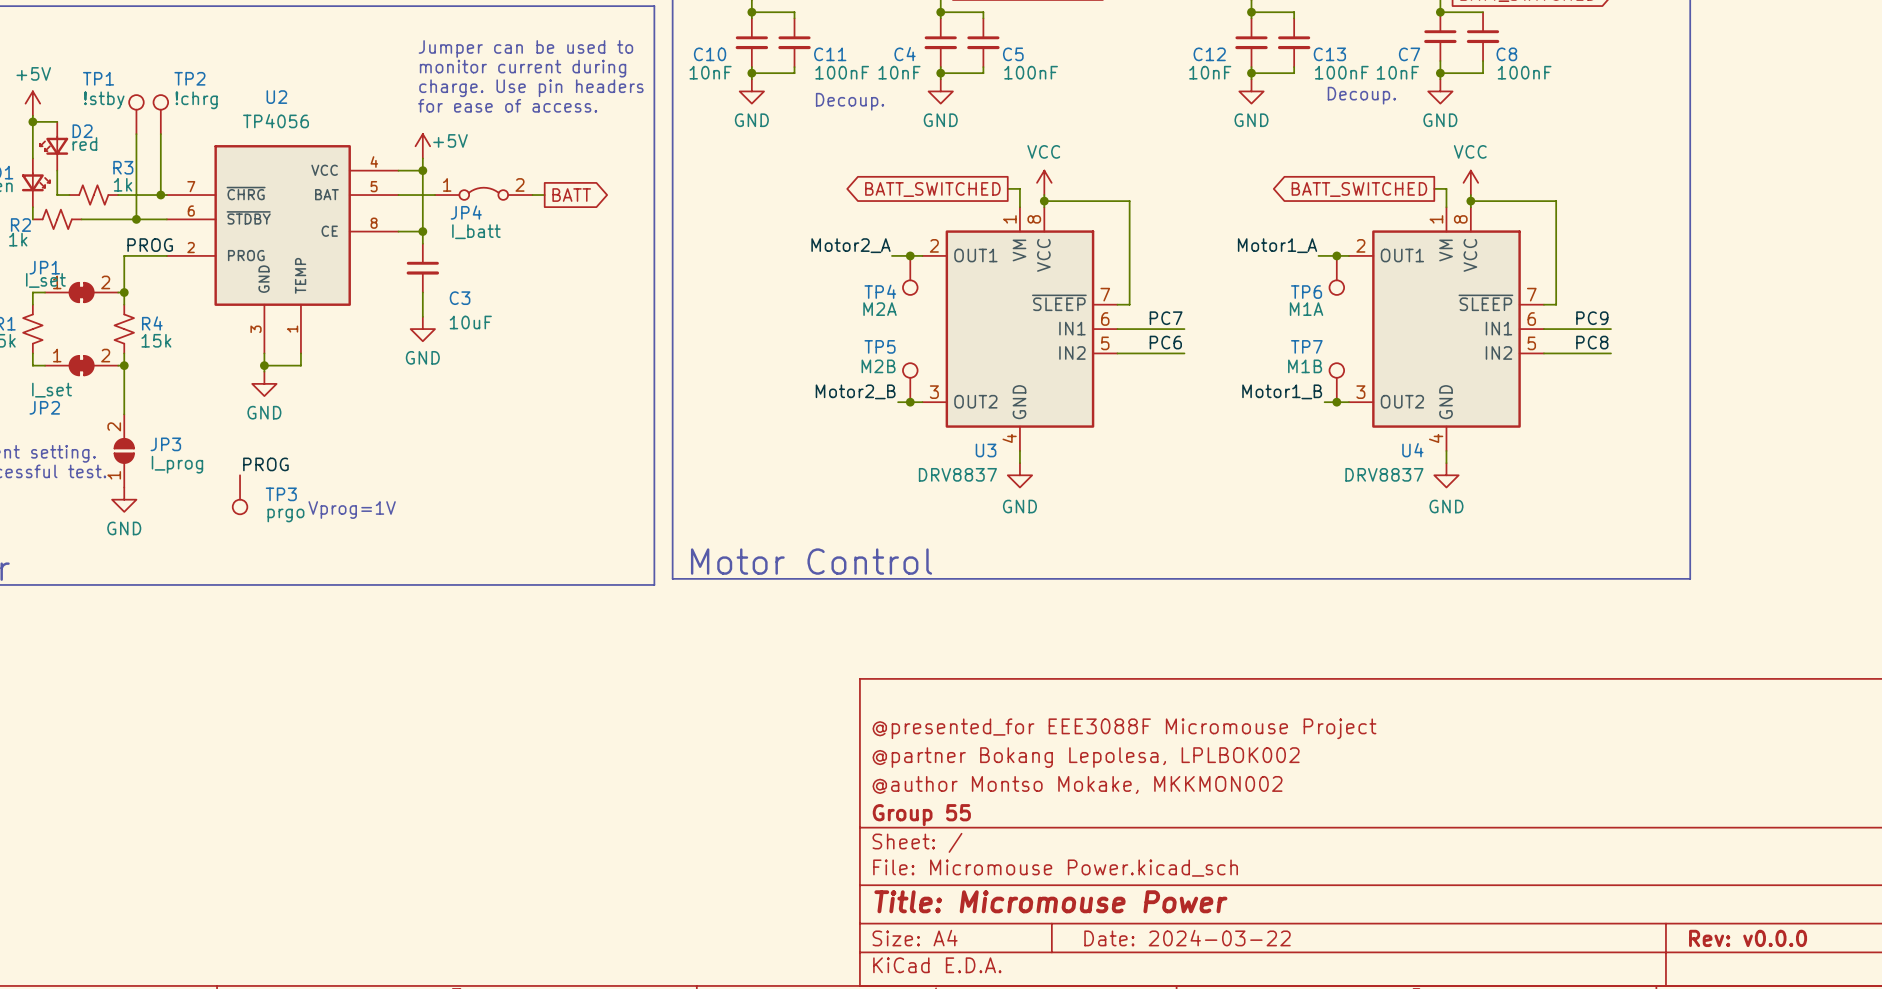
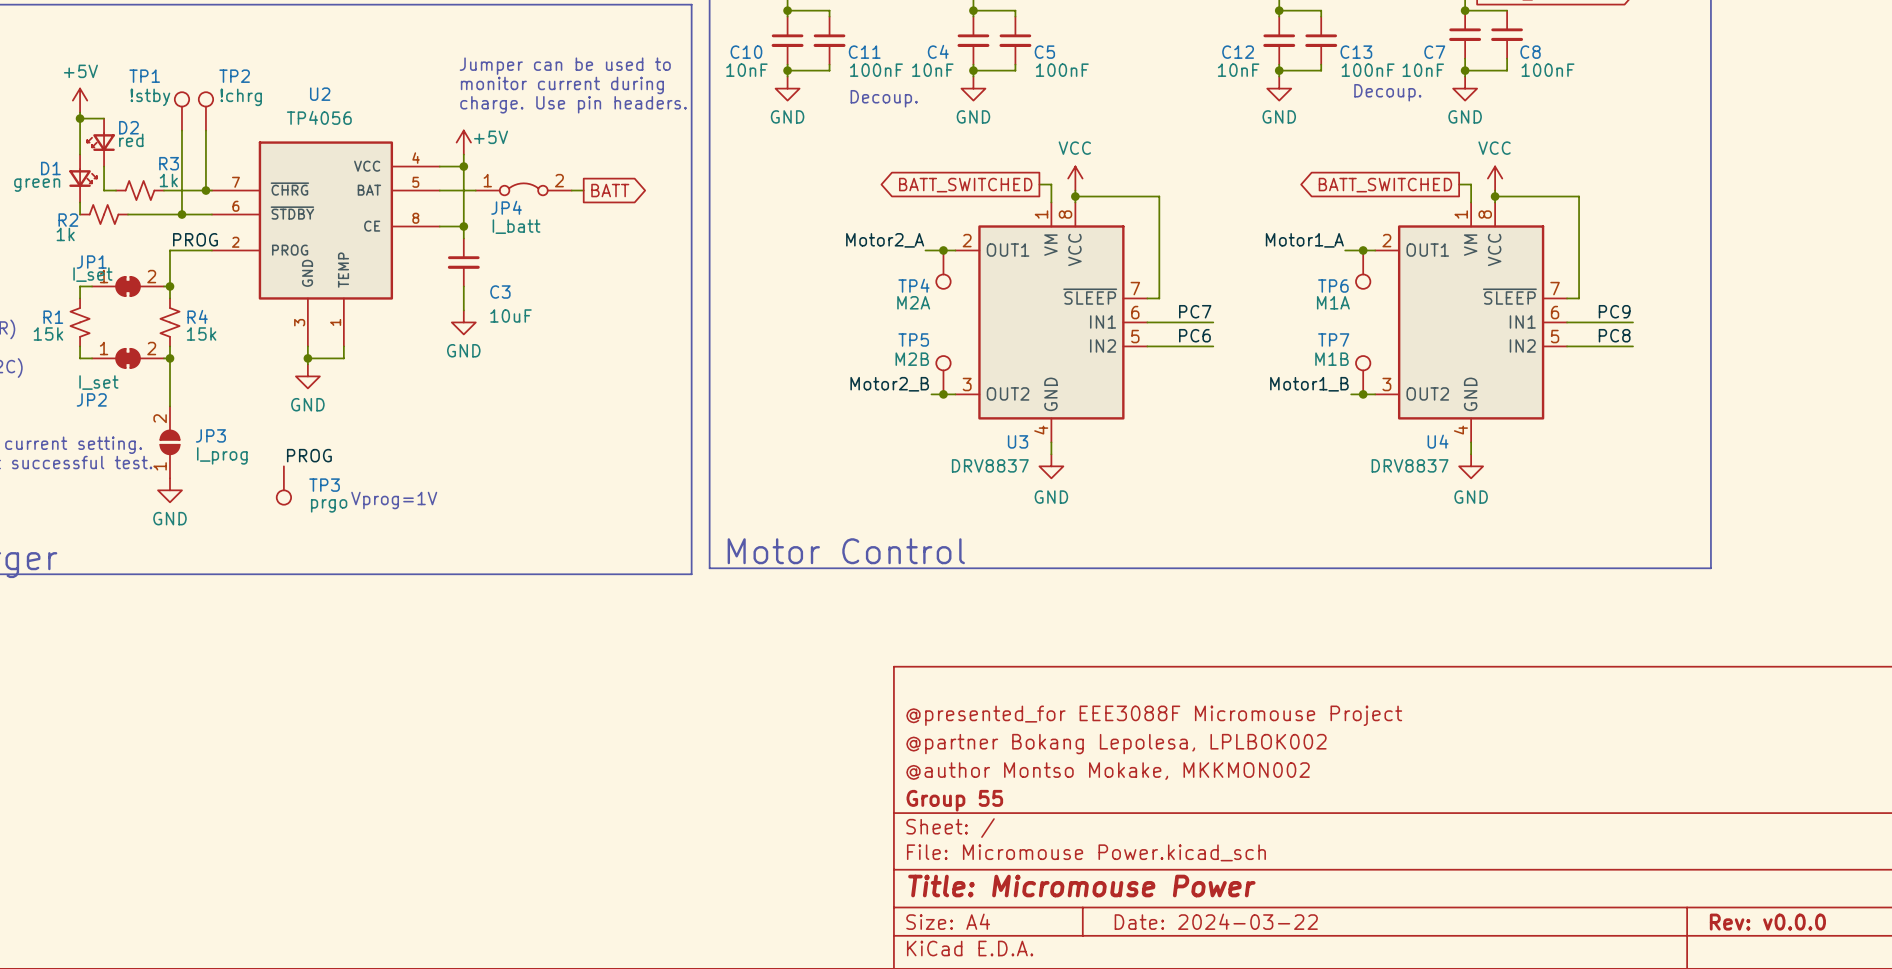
text: Jumper can be used to (525, 48) -> none
text: monitor current during (523, 68) -> Jumper can be used to (565, 66)
text: charge. Use pin headers (531, 88) -> monitor current during (562, 85)
text: for ease of access. (507, 105) -> charge. Use pin headers. (573, 104)

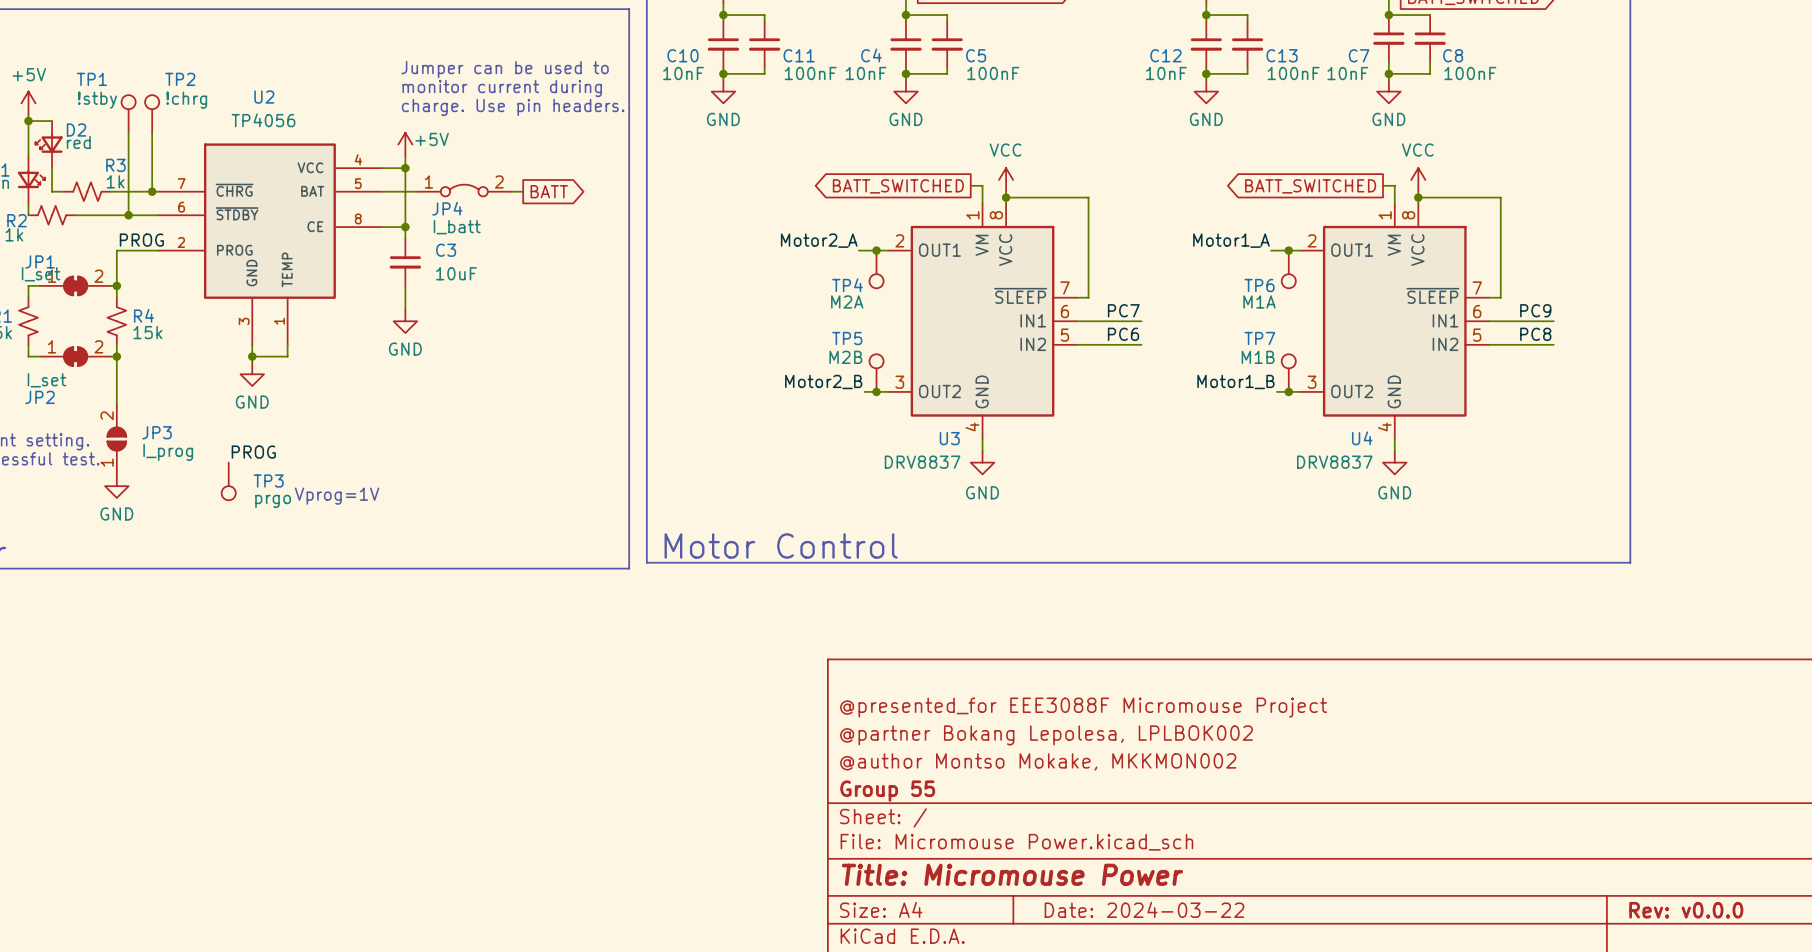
text: Decoup. (1387, 92) -> none
text: Decoup. (884, 98) -> none
C3 name position: C3 (500, 292) -> C3 (446, 250)
C3 value position: 10uF (510, 316) -> 10uF (456, 273)

